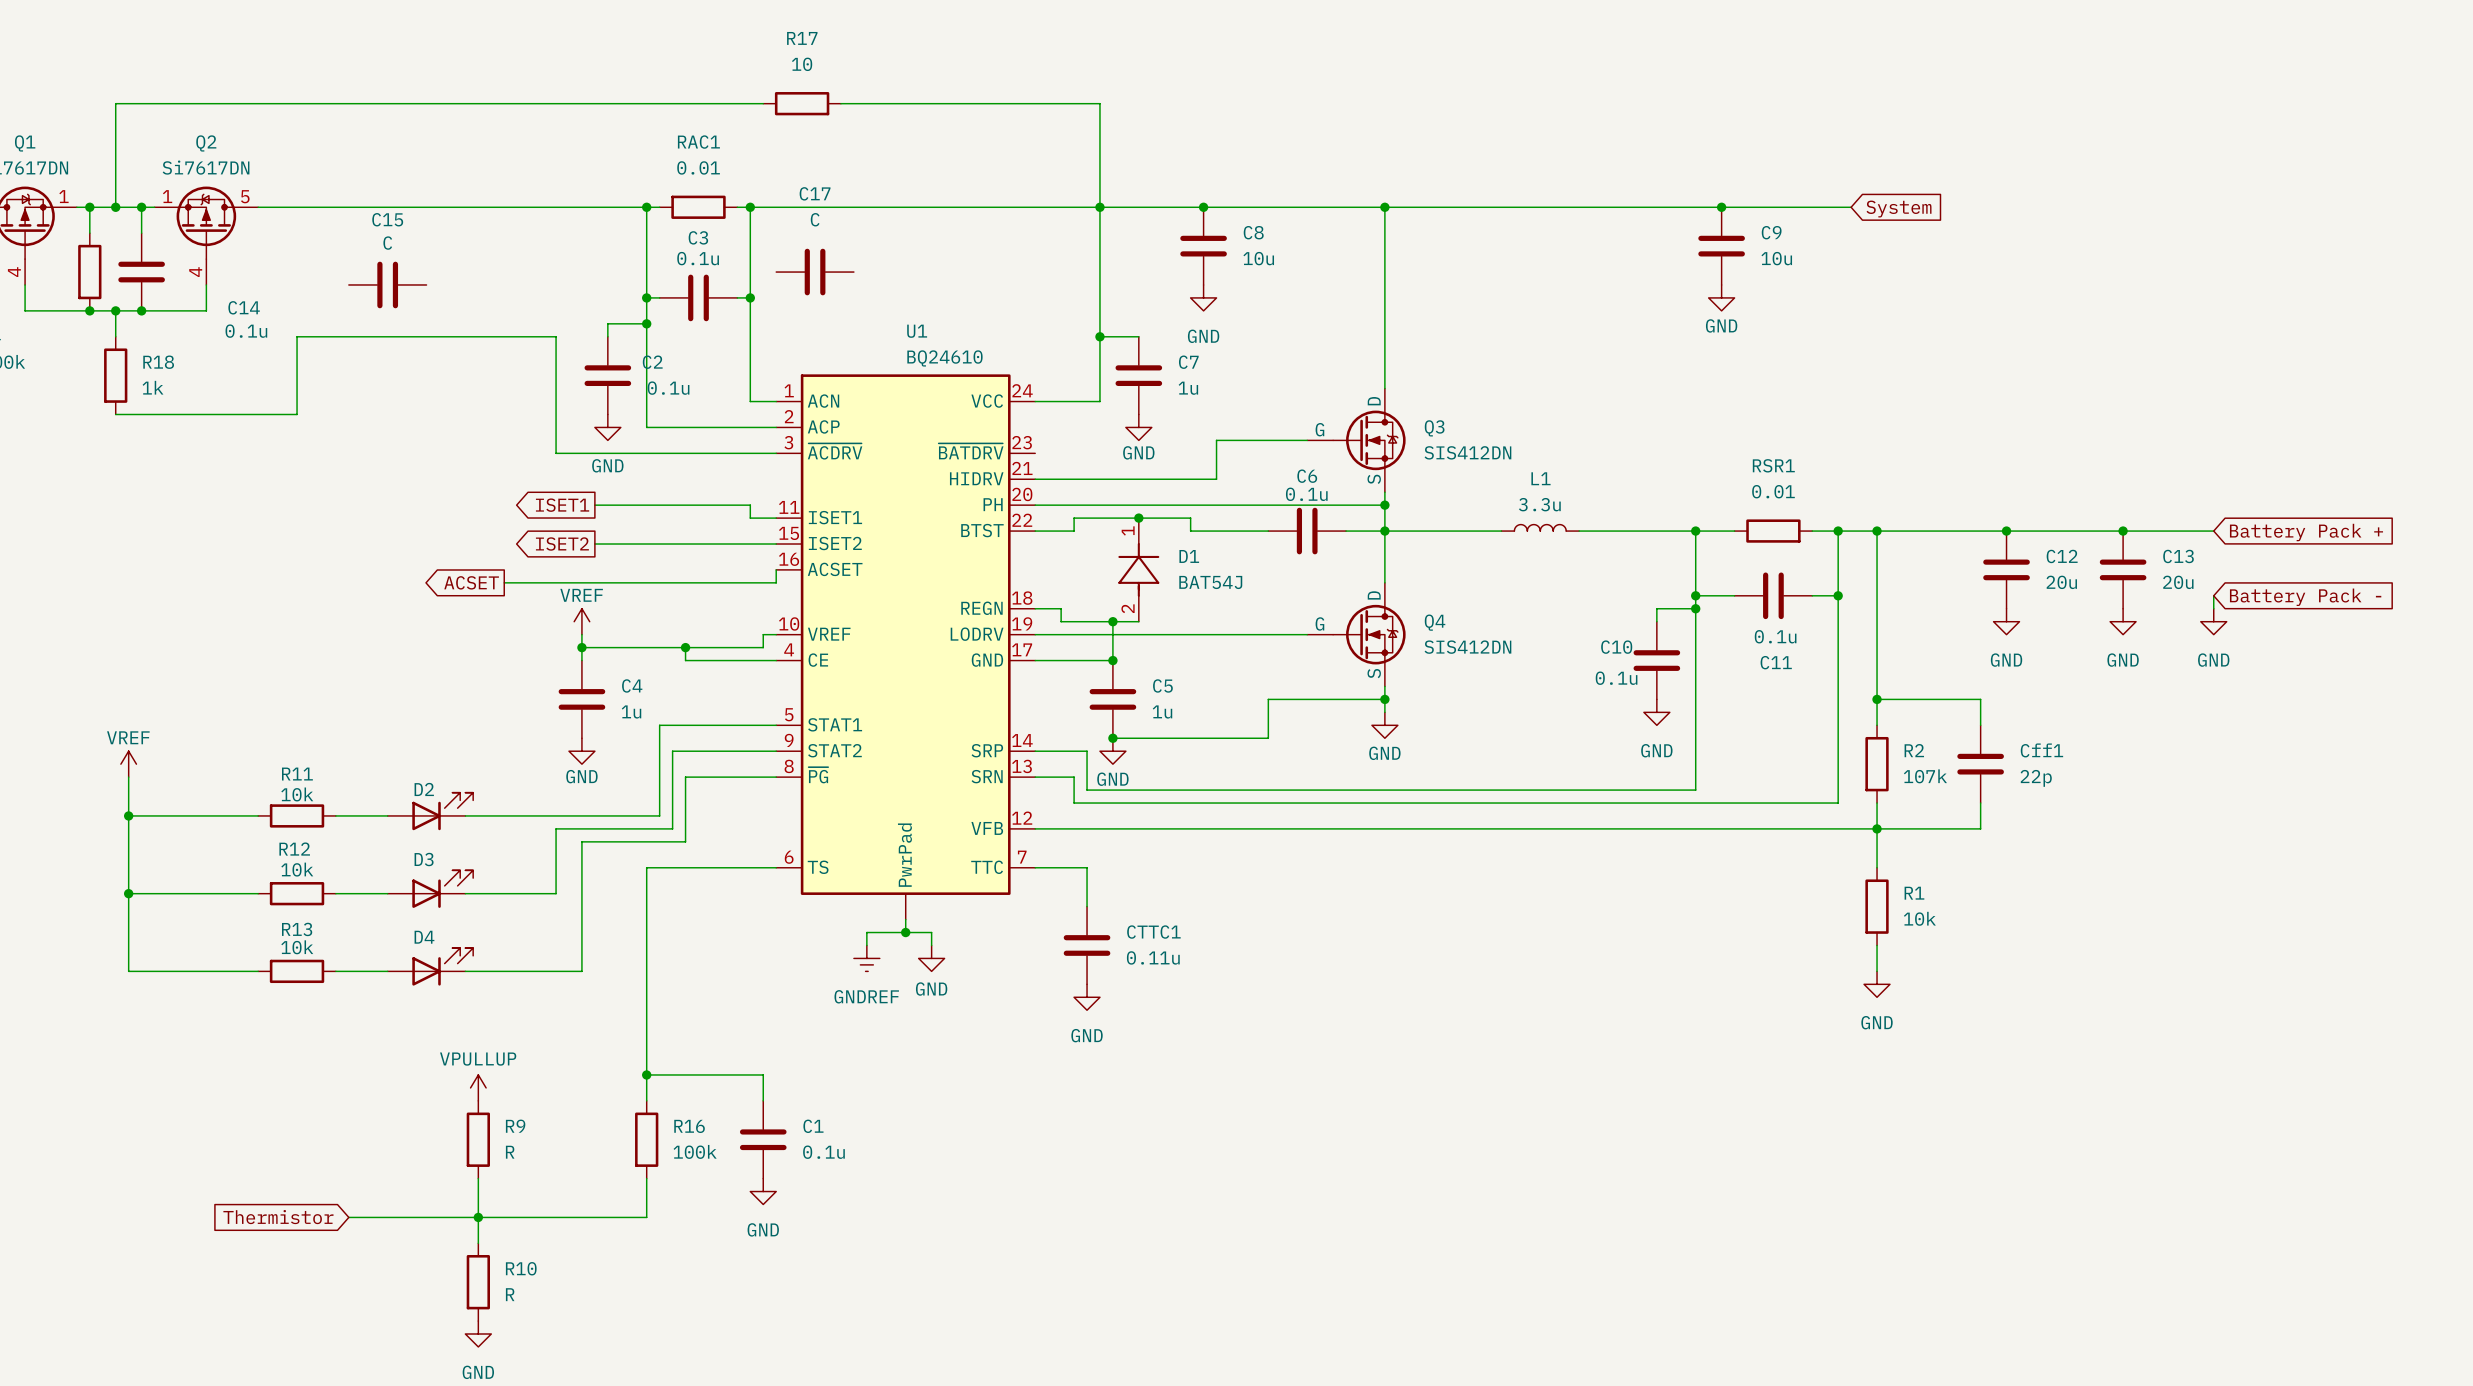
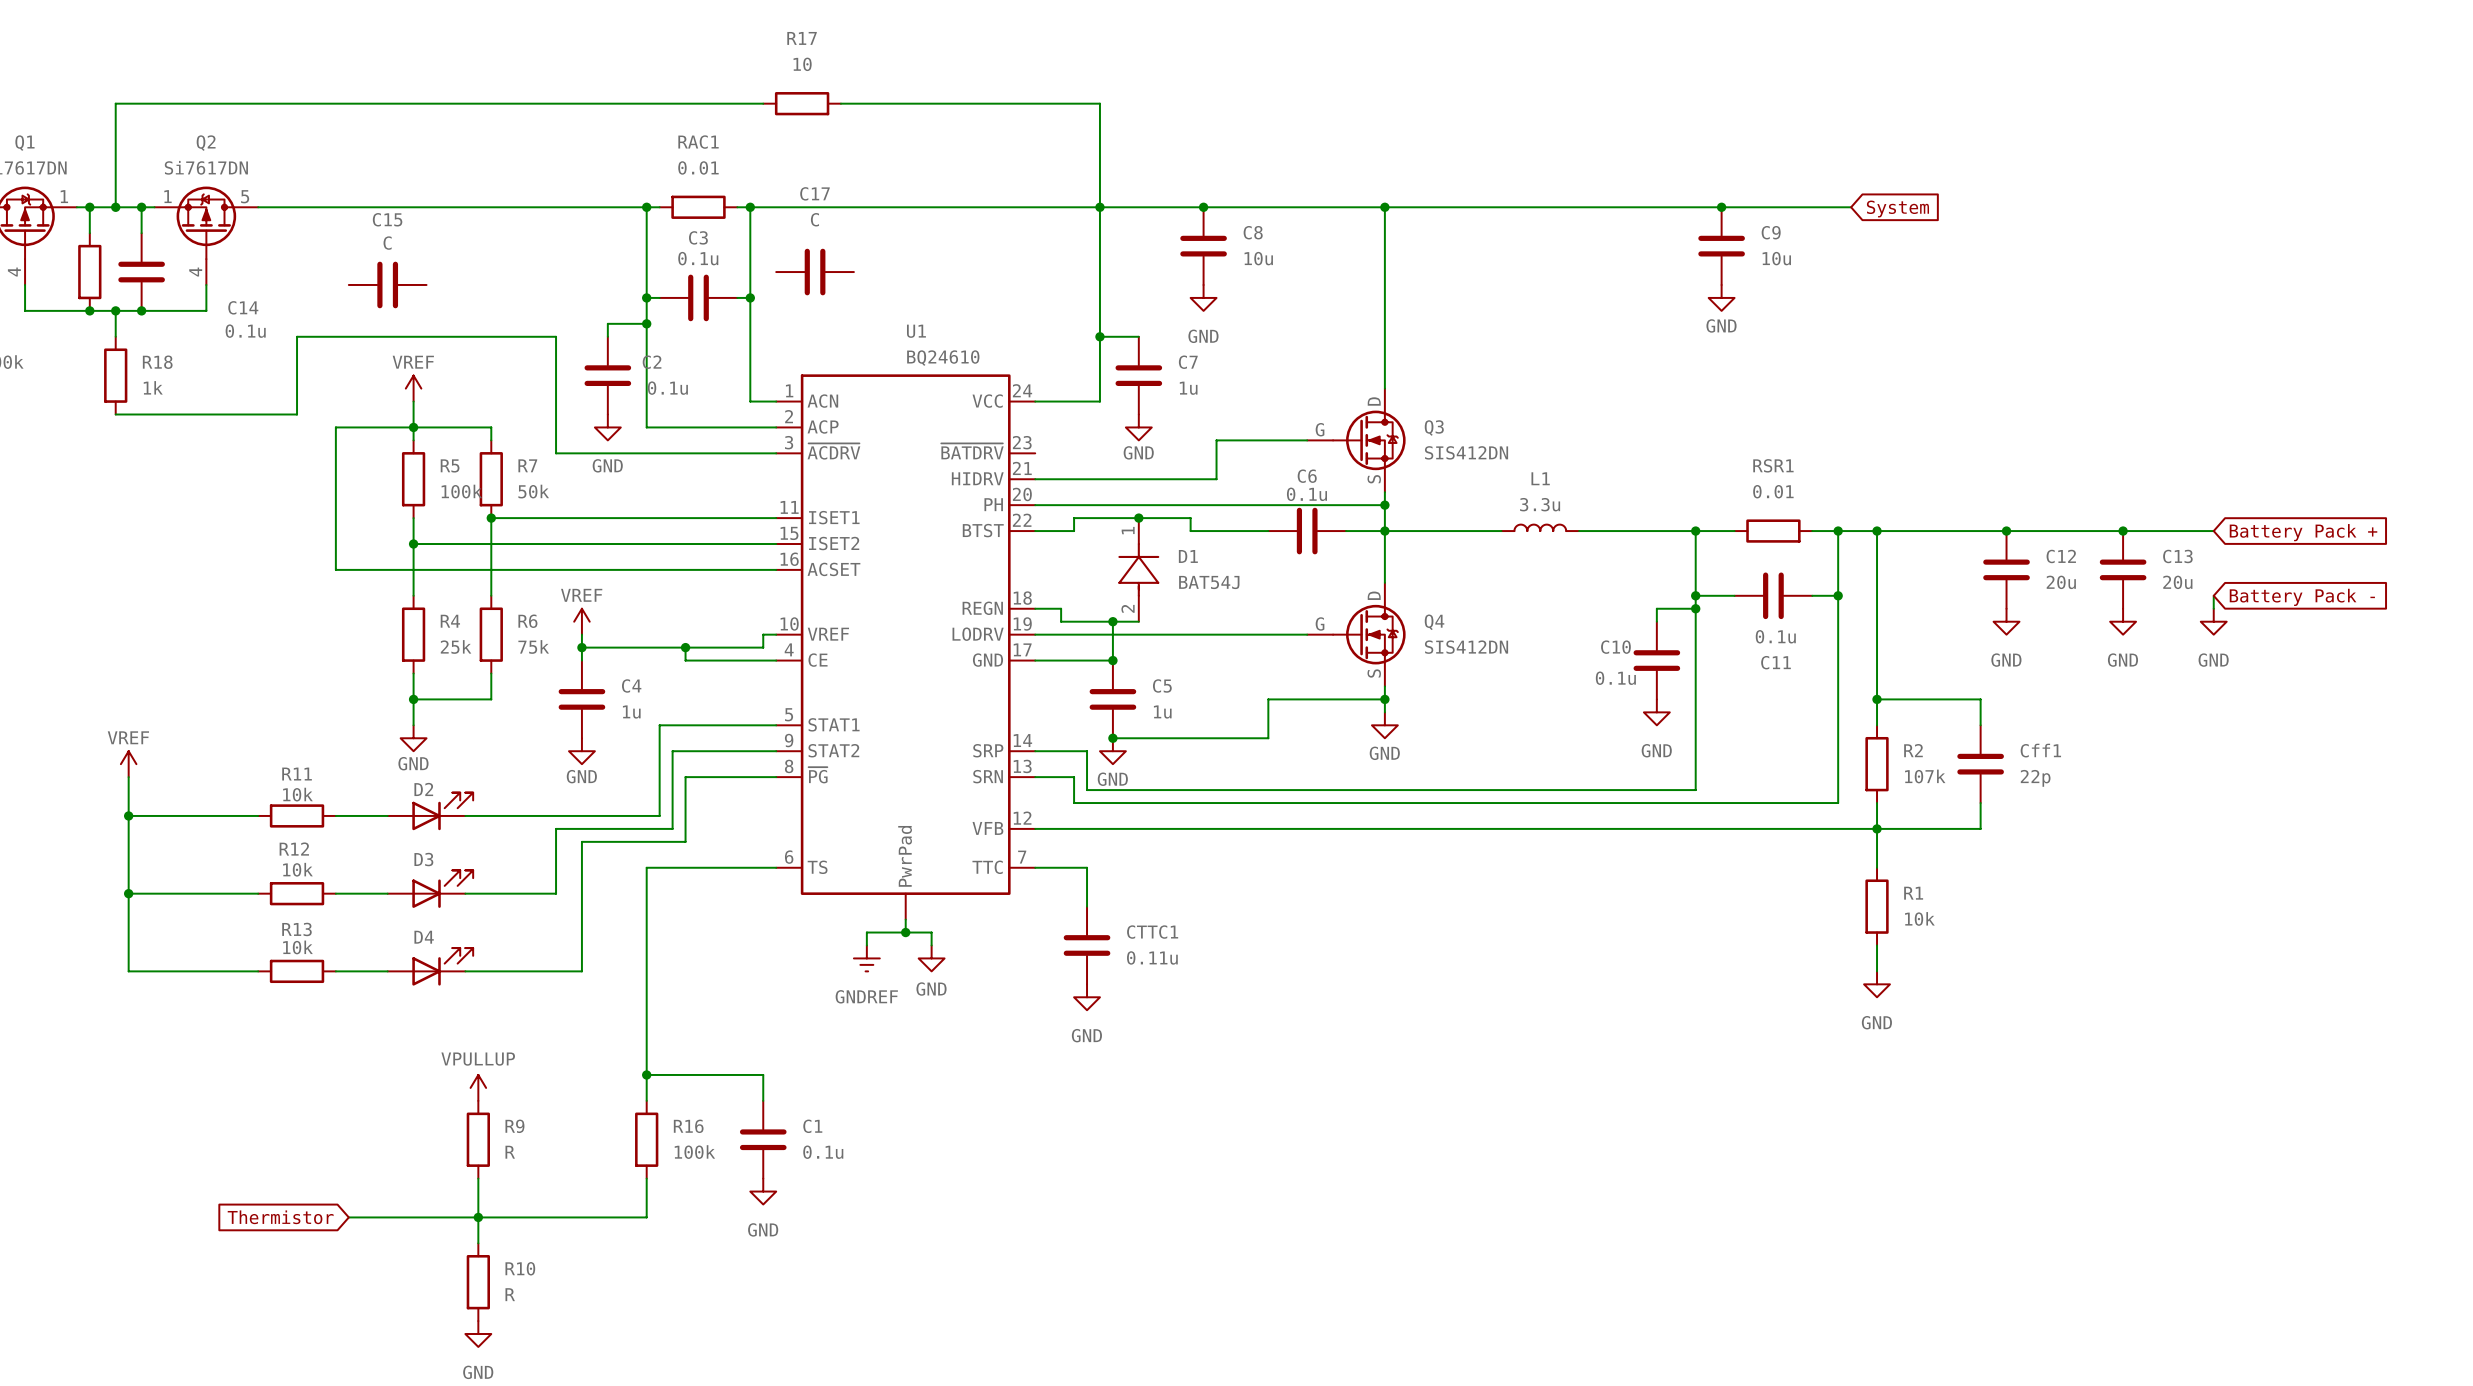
power symbol: none -> VREF (413, 388)
wire: none -> (413, 401) (413, 440)
junction: none -> (413, 427)
R5: none -> 100k (413, 479)
R7: none -> 50k (491, 479)
global label: ISET1 (562, 505) -> none
wire: (594, 505) (750, 505) (750, 518) -> (491, 595) (491, 518) (750, 518)
wire: none -> (413, 518) (413, 595)
junction: none -> (491, 518)
wire: none -> (413, 544) (594, 544)
junction: none -> (413, 544)
global label: ISET2 (562, 544) -> none
wire: (776, 569) (776, 582) (504, 582) -> (776, 569) (335, 569) (335, 427) (491, 427) (491, 440)
global label: ACSET (471, 582) -> none
R4: none -> 25k (413, 634)
R6: none -> 75k (491, 634)
wire: none -> (413, 673) (413, 725)
wire: none -> (491, 673) (491, 699) (413, 699)
junction: none -> (413, 699)
power symbol: none -> GND (413, 738)

